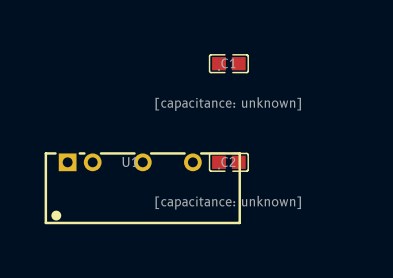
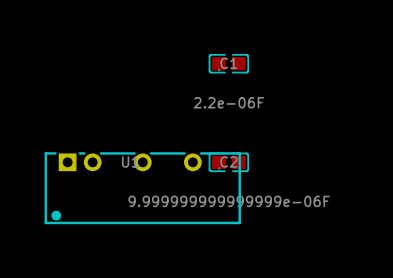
C1 value: [capacitance: unknown] (228, 104) -> 2.2e-06F (228, 102)
C2 value: [capacitance: unknown] (228, 202) -> 9.999999999999999e-06F (229, 201)

